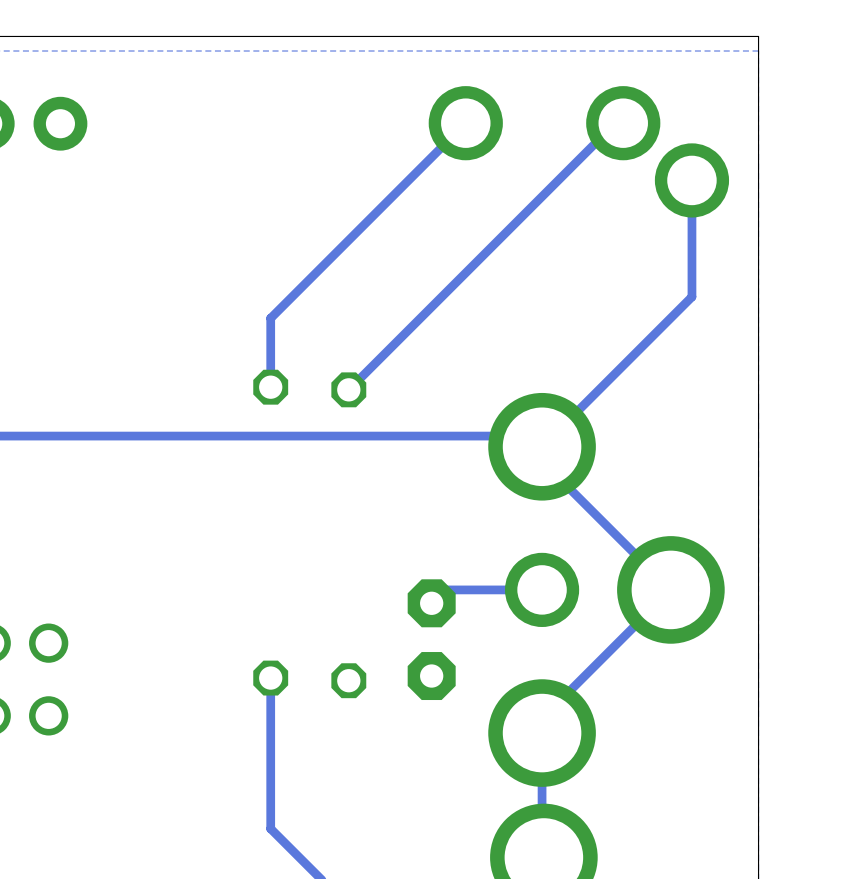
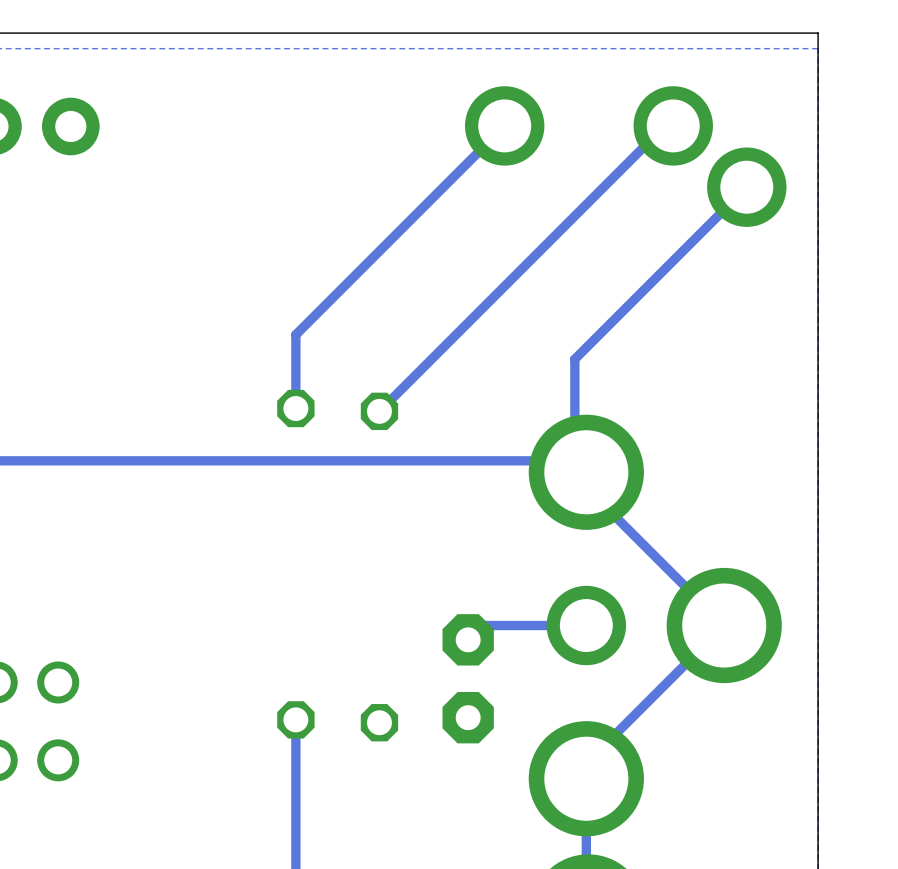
track: (691, 180) (691, 296) (542, 446) -> (746, 187) (574, 359) (574, 460)

